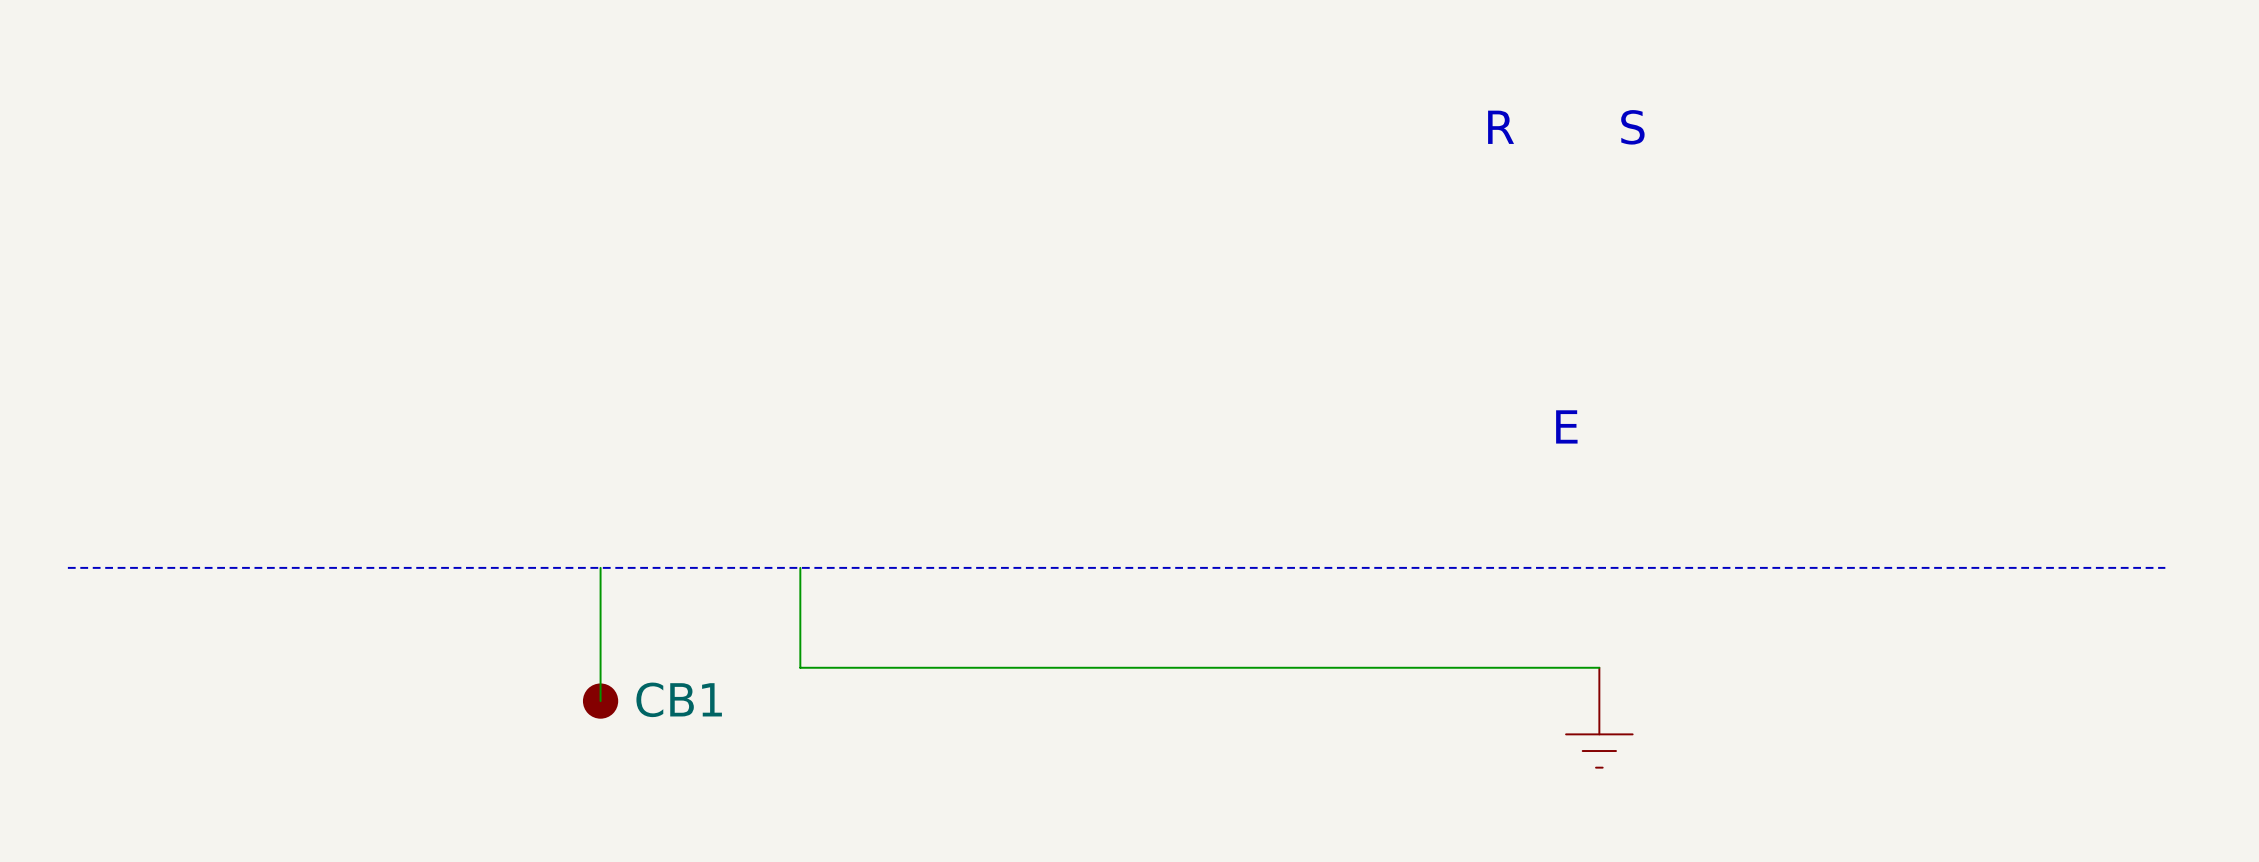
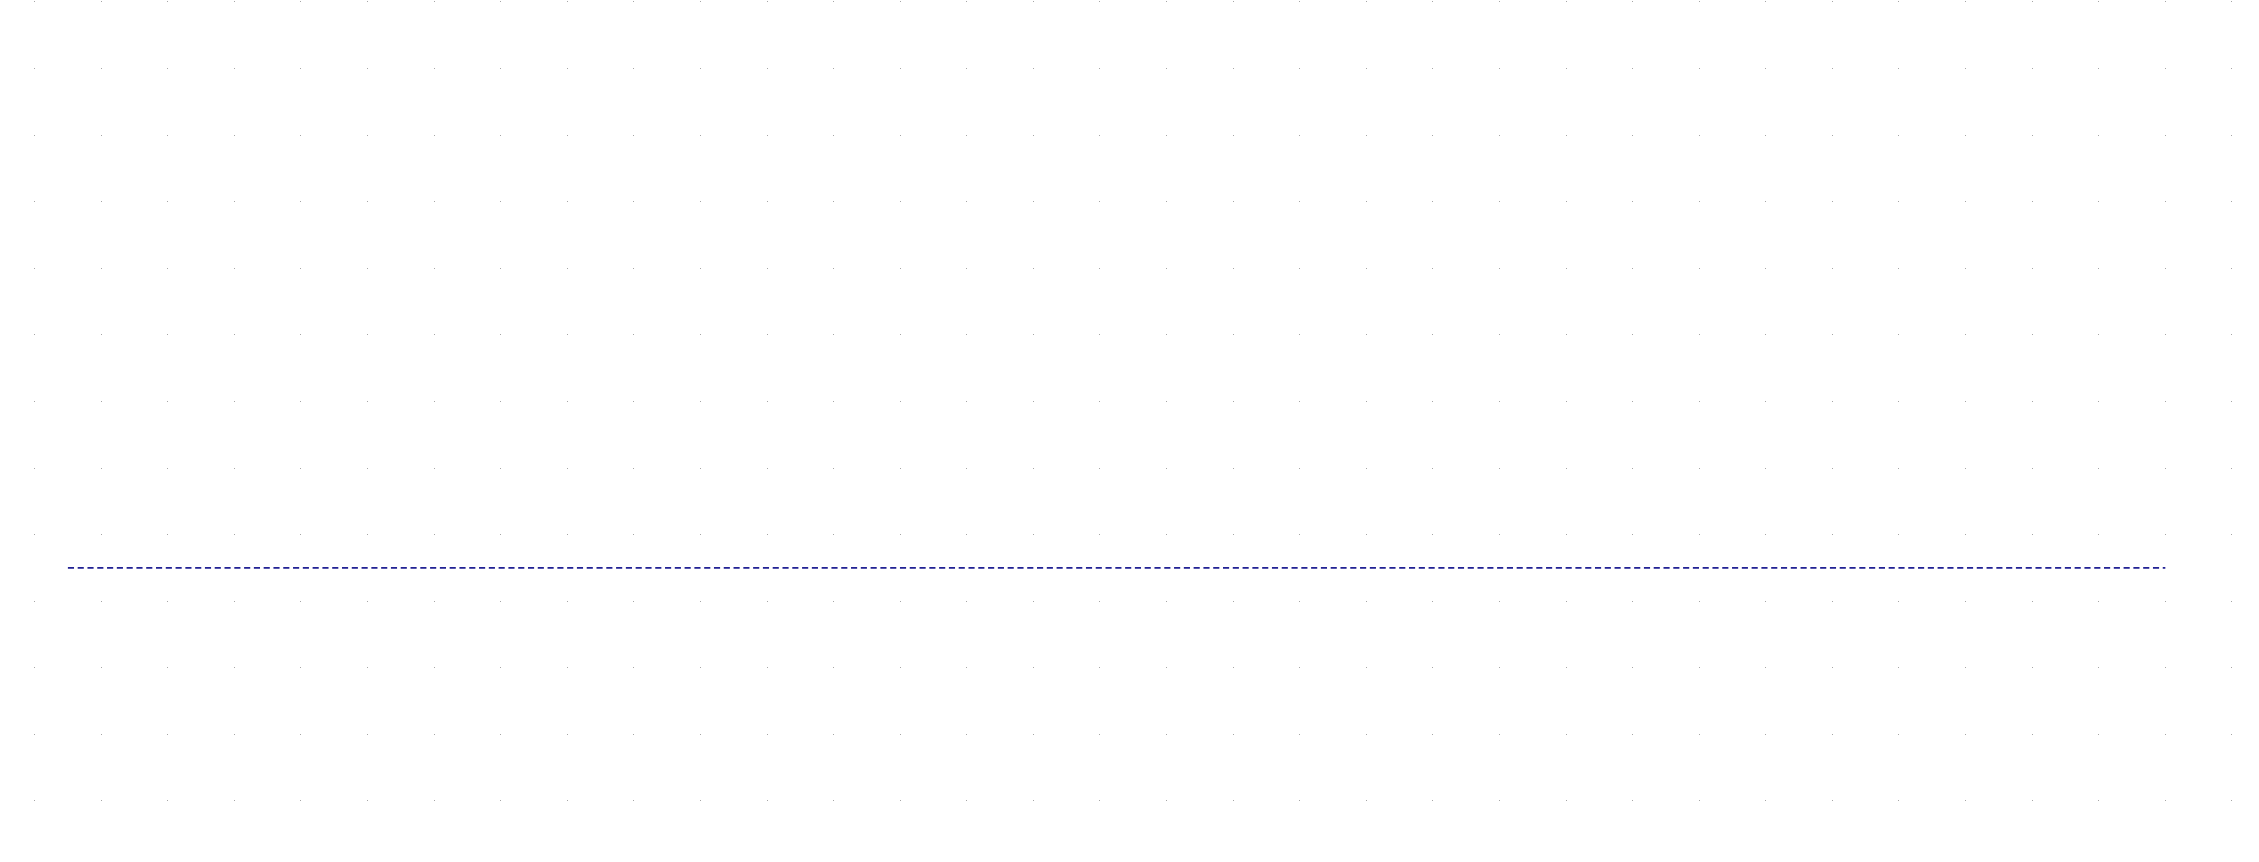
text: R (1501, 127) -> none
text: S (1632, 127) -> none
text: E (1566, 426) -> none
wire: (600, 567) (600, 701) -> none
wire: (800, 567) (800, 667) (1599, 667) -> none
CB1: (600, 701) -> none
power symbol: (1599, 717) -> none

